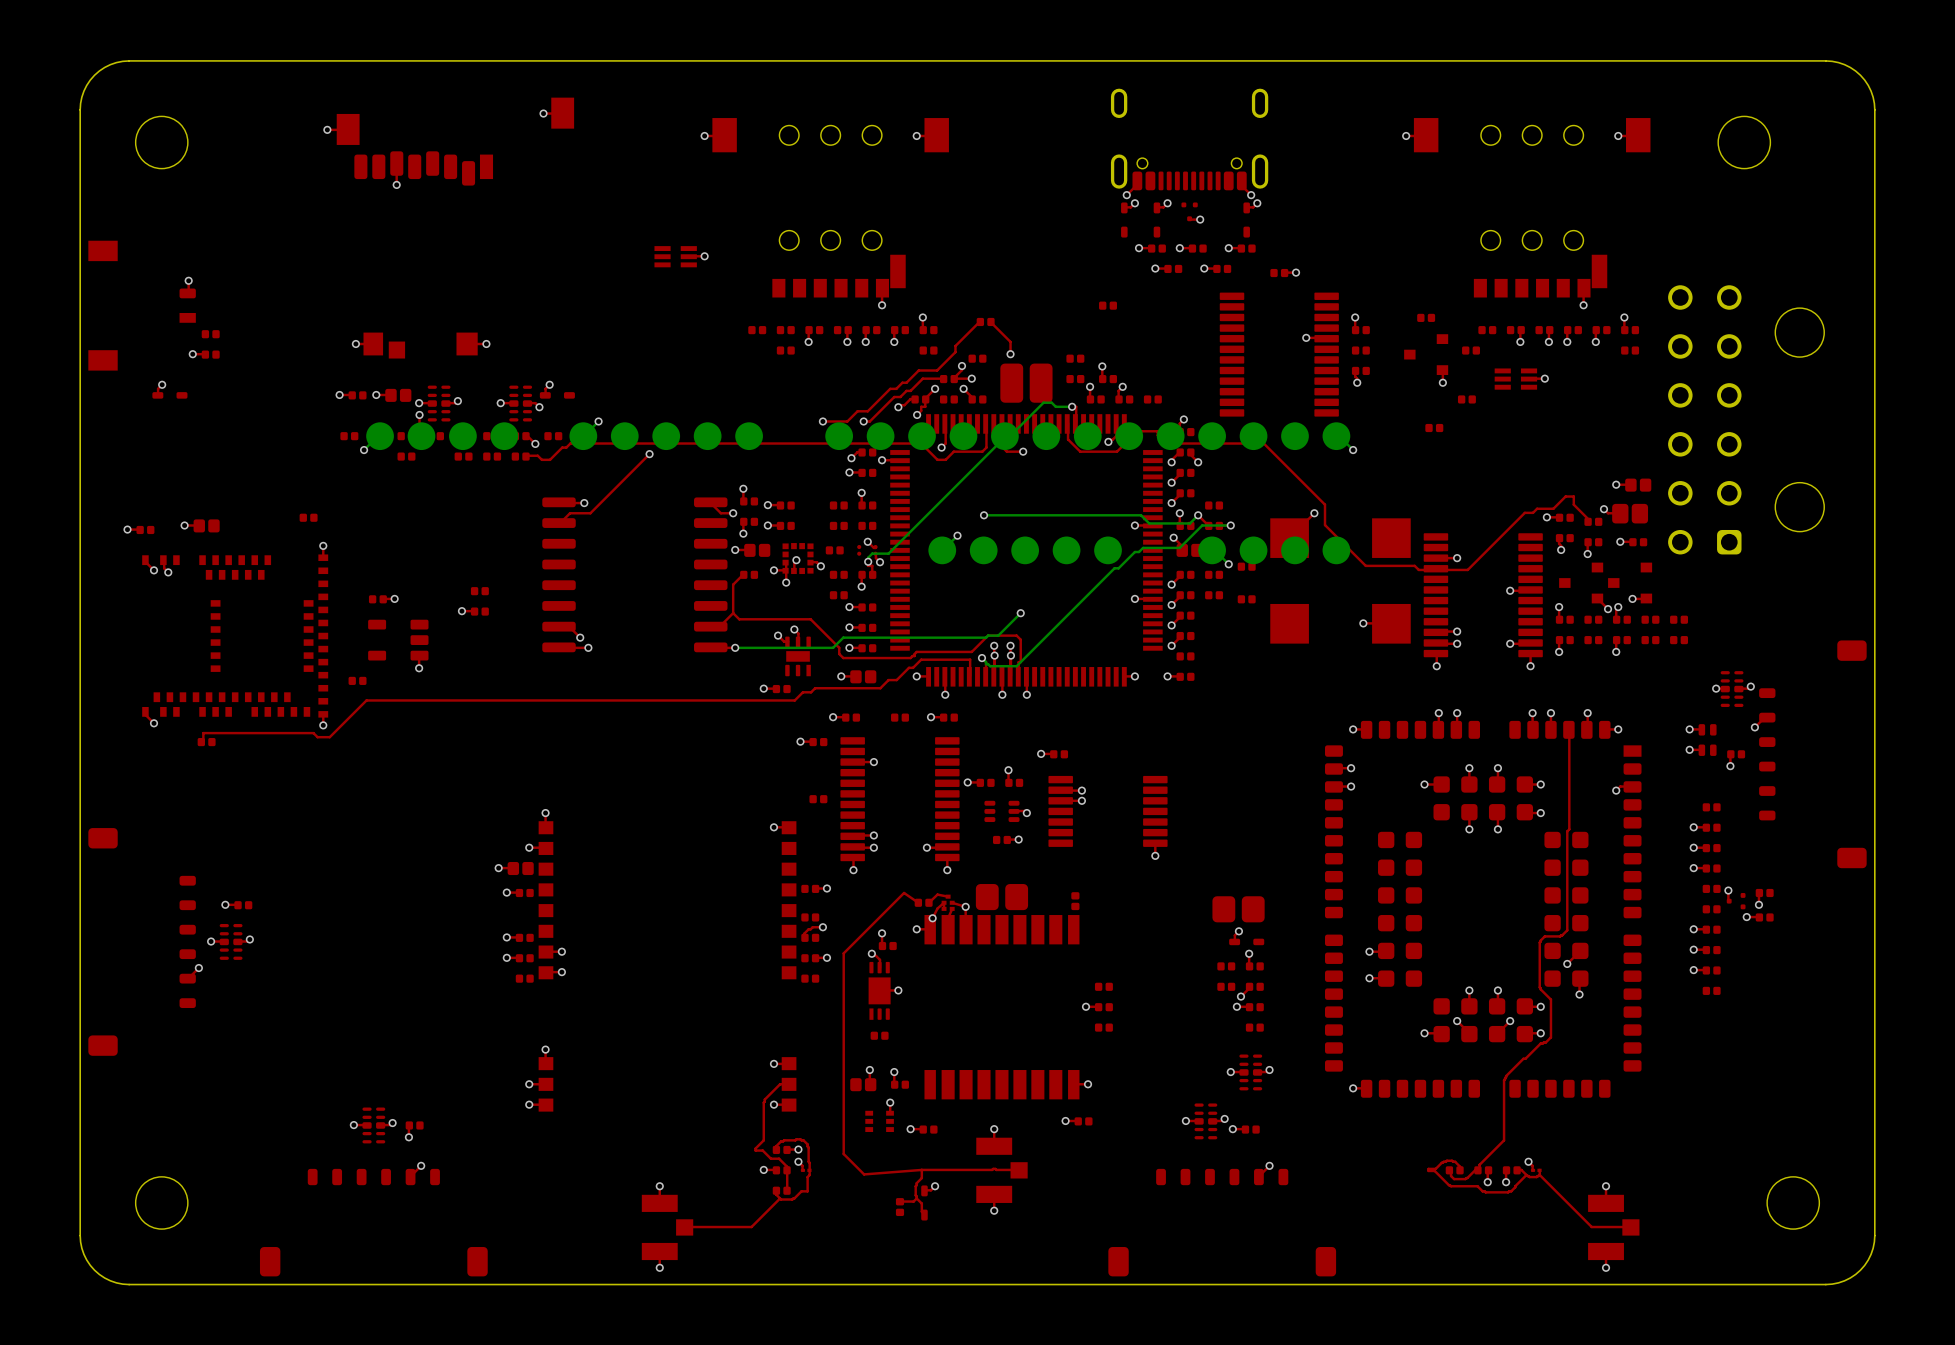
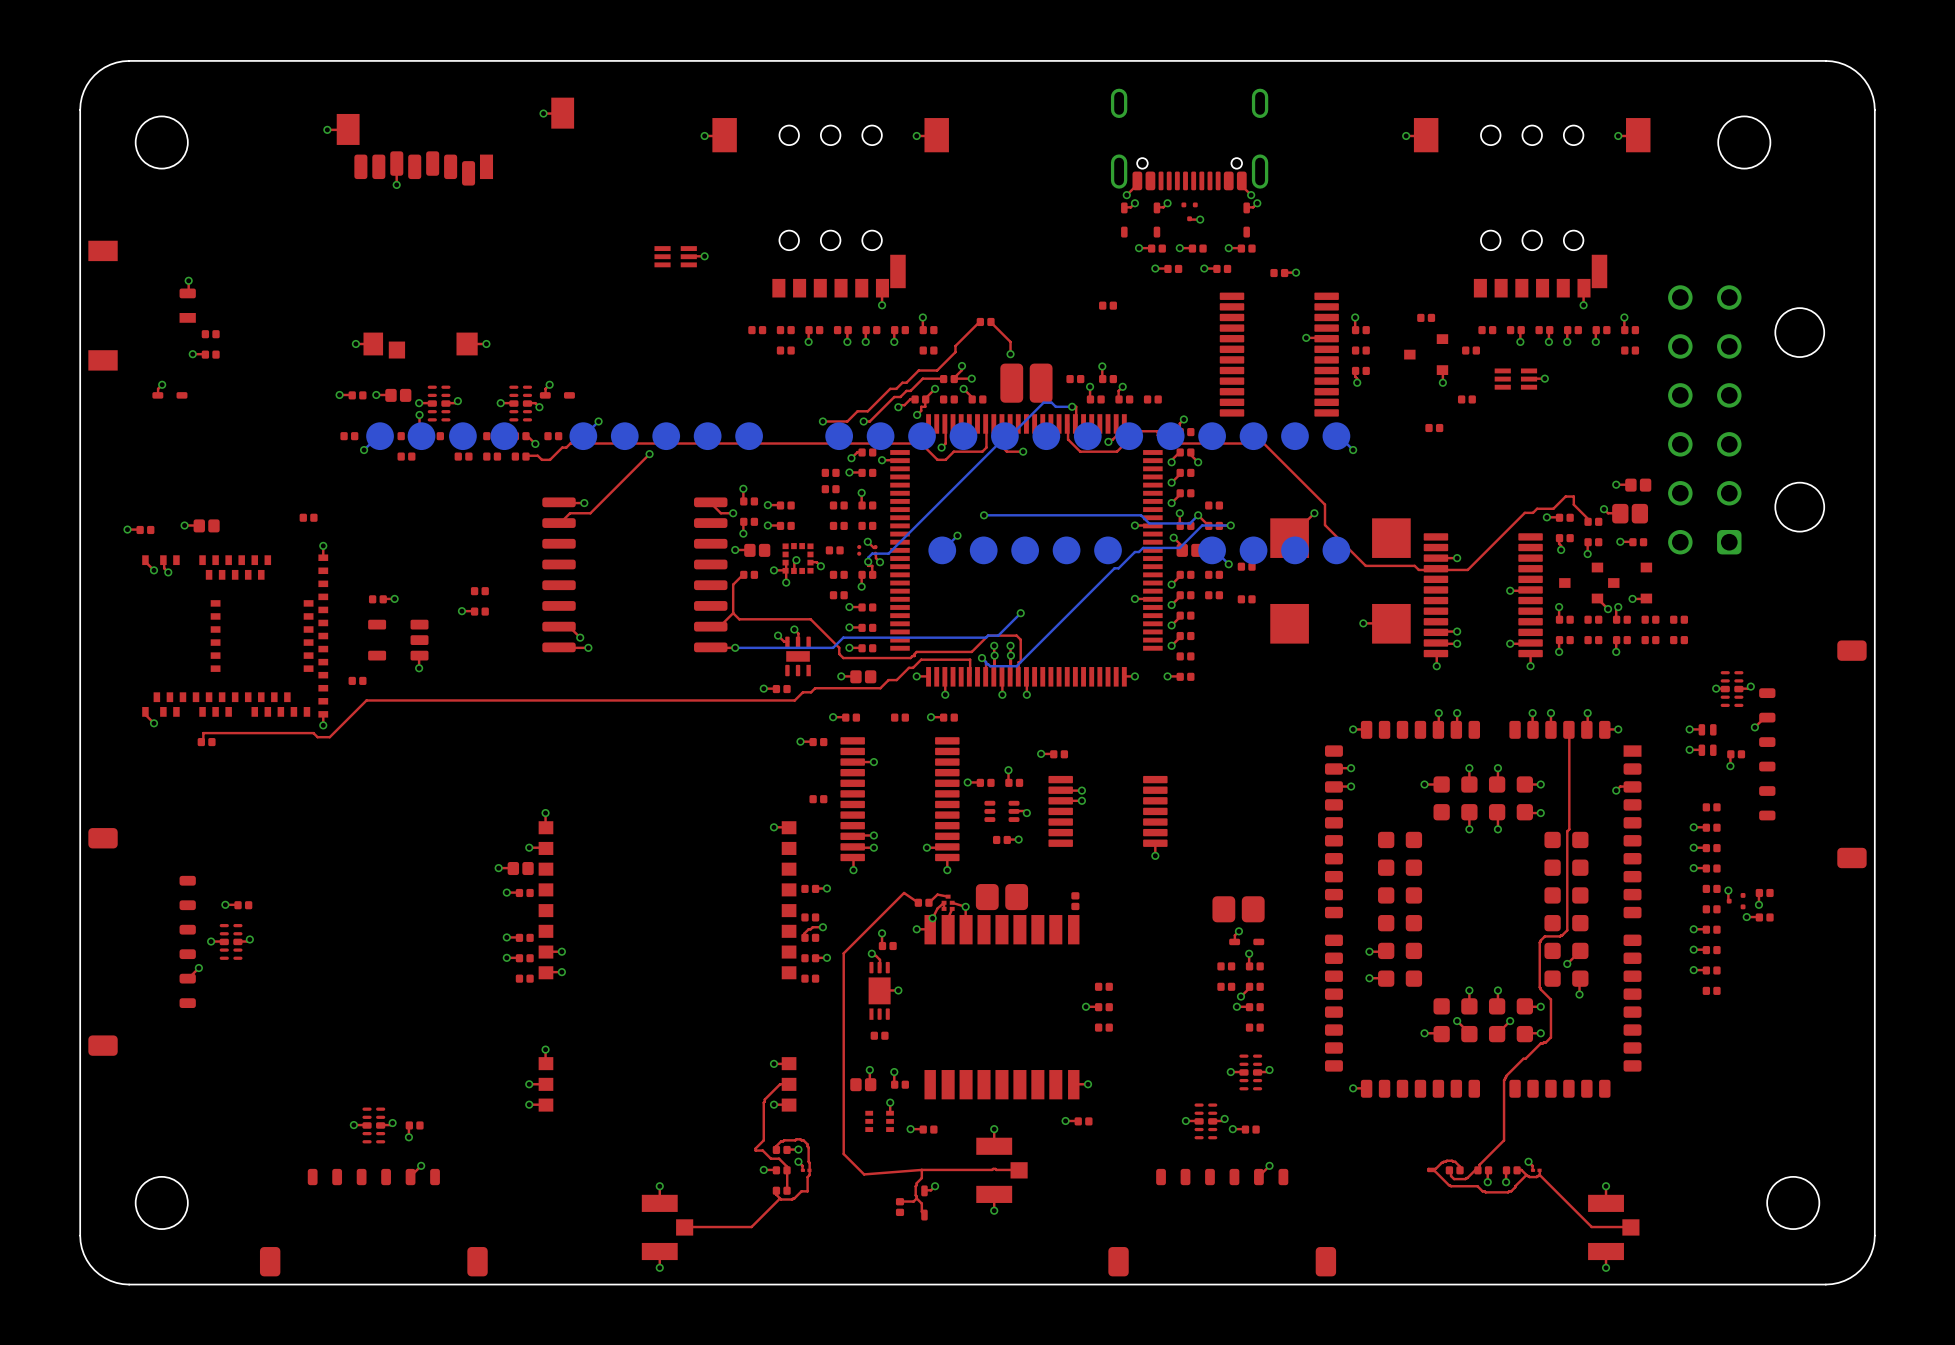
part: (977, 358) -> none
part: (1075, 358) -> none
part: none -> (830, 472)
part: none -> (830, 489)

